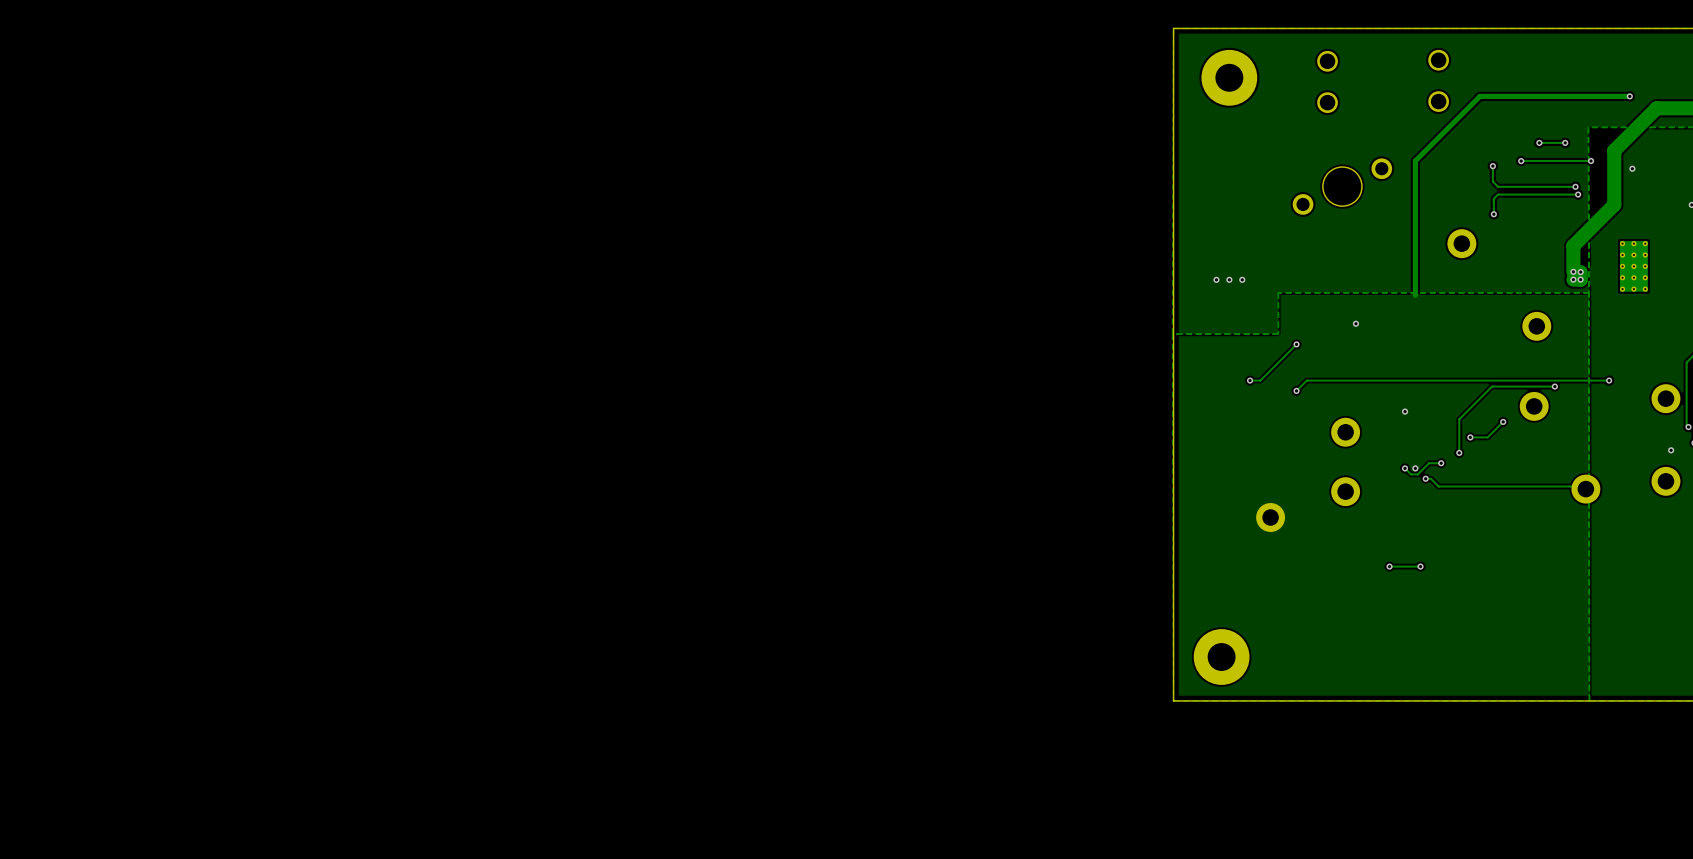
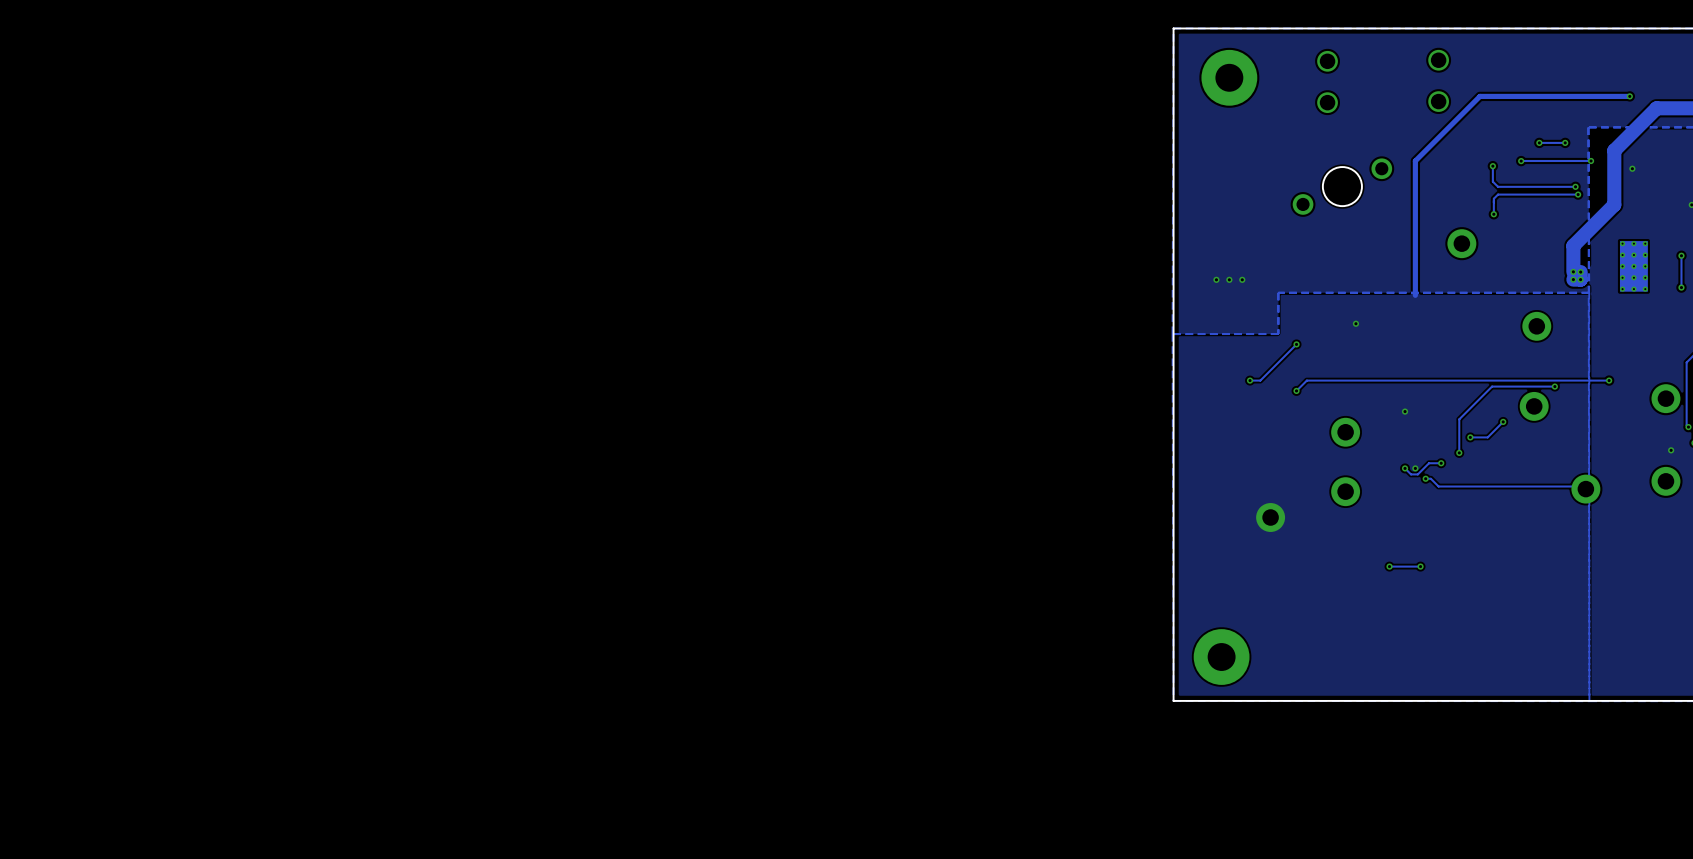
track: none -> (1681, 255) (1681, 287)
via: none -> (1681, 255)
via: none -> (1681, 287)

